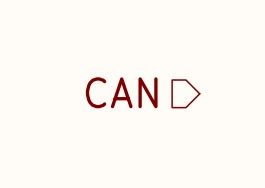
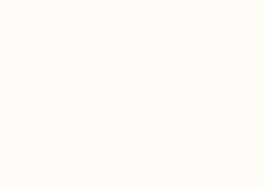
hierarchical label: CAN (121, 92) -> none

